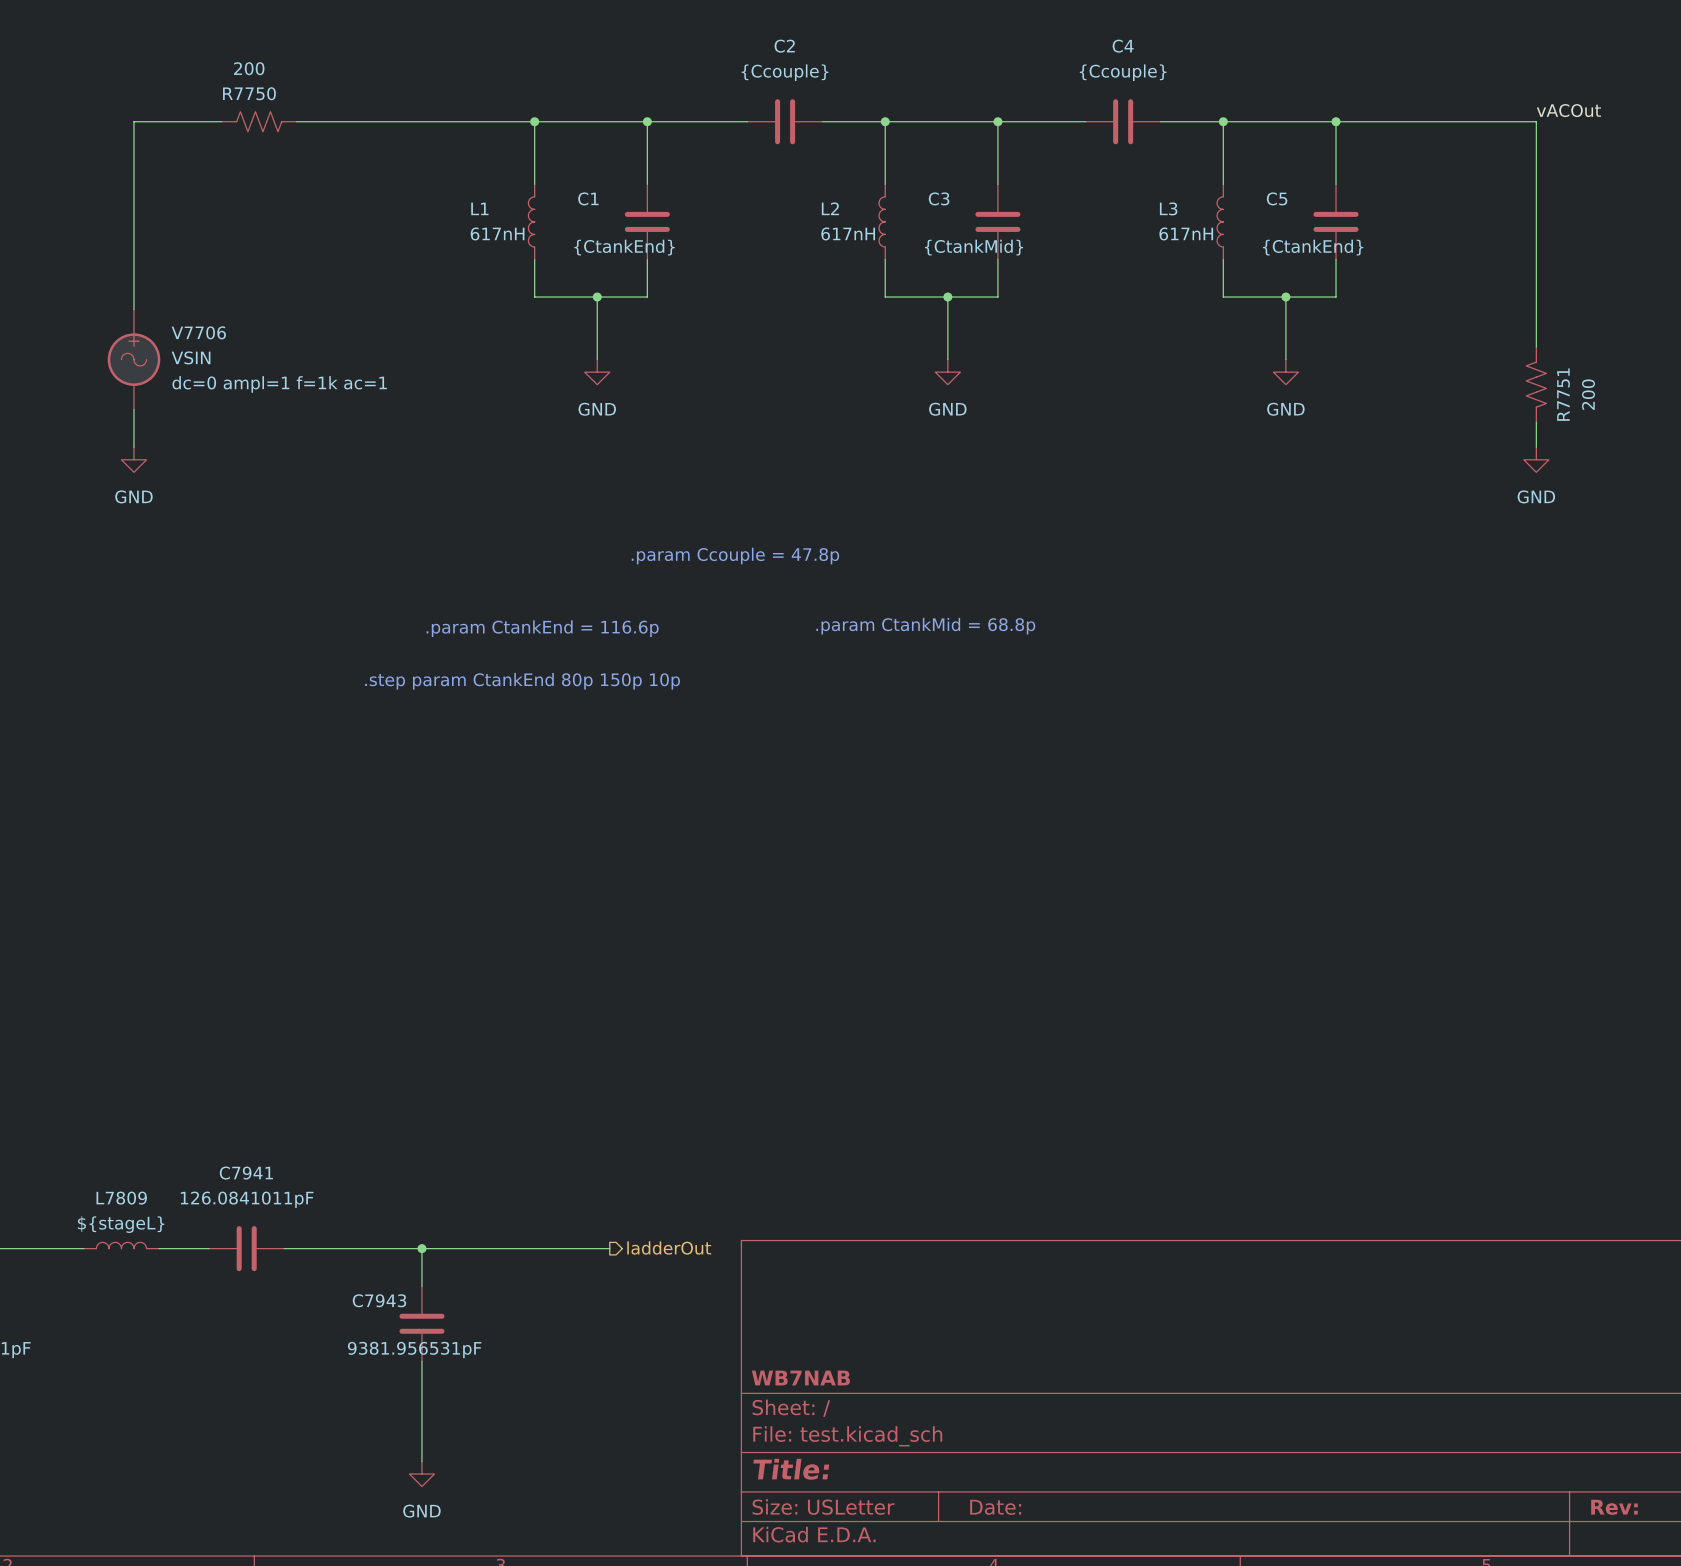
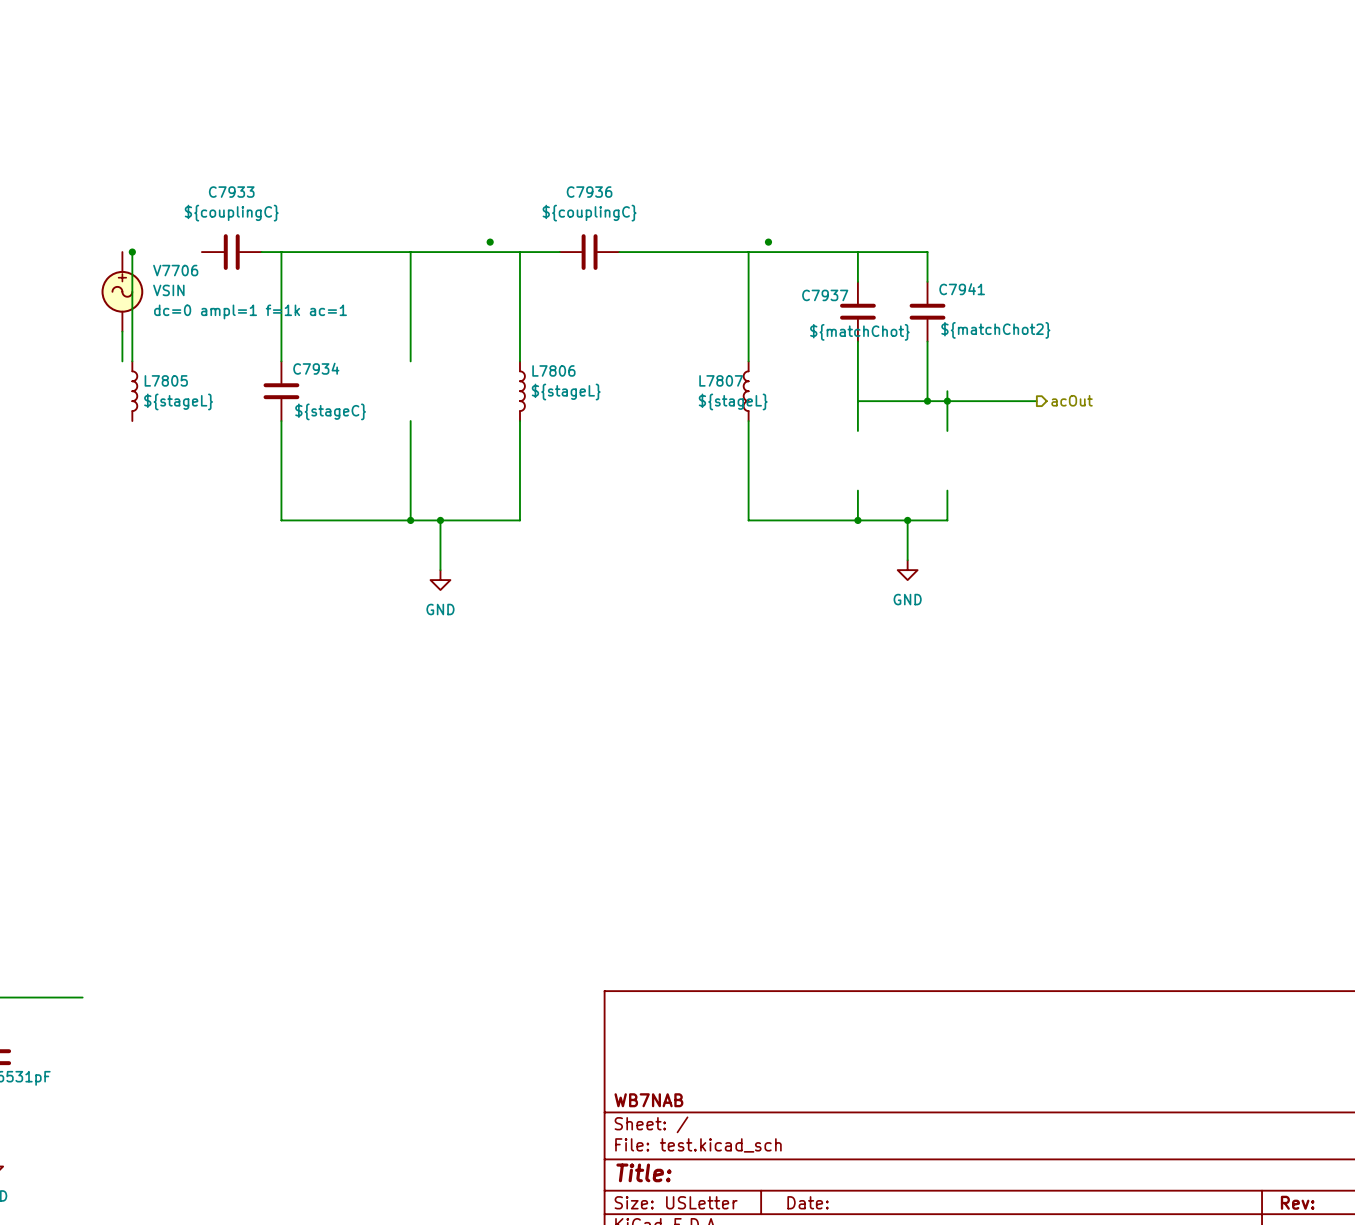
label: vACOut (1568, 110) -> none
wire: (221, 121) (133, 121) (133, 309) -> none
R7750: 200 (259, 121) -> none
wire: (296, 121) (747, 121) -> none
wire: (534, 121) (534, 184) -> none
junction: (534, 121) -> none
wire: (647, 121) (647, 184) -> none
junction: (647, 121) -> none
C2: {Ccouple} (785, 121) -> none
wire: (822, 121) (1085, 121) -> none
wire: (885, 121) (885, 184) -> none
junction: (885, 121) -> none
wire: (997, 121) (997, 184) -> none
junction: (997, 121) -> none
C4: {Ccouple} (1123, 121) -> none
wire: (1160, 121) (1536, 121) (1536, 347) -> none
wire: (1223, 121) (1223, 184) -> none
junction: (1223, 121) -> none
wire: (1336, 121) (1336, 184) -> none
junction: (1336, 121) -> none
L1: 617nH (531, 221) -> none
C1: {CtankEnd} (647, 221) -> none
L2: 617nH (882, 221) -> none
C3: {CtankMid} (997, 221) -> none
L3: 617nH (1220, 221) -> none
C5: {CtankEnd} (1336, 221) -> none
wire: (534, 259) (534, 297) (647, 297) (647, 259) -> none
wire: (885, 259) (885, 297) (997, 297) (997, 259) -> none
wire: (1223, 259) (1223, 297) (1336, 297) (1336, 259) -> none
wire: (597, 297) (597, 359) -> none
wire: (947, 297) (947, 359) -> none
wire: (1285, 297) (1285, 359) -> none
junction: (1285, 297) -> none
wire: none -> (132, 252) (132, 361)
junction: none -> (132, 252)
C7933: none -> ${couplingC} (231, 252)
wire: none -> (261, 252) (559, 252)
wire: none -> (281, 252) (281, 361)
wire: none -> (410, 252) (410, 361)
wire: none -> (519, 252) (519, 361)
C7936: none -> ${couplingC} (589, 252)
wire: none -> (619, 252) (927, 252) (927, 281)
wire: none -> (748, 252) (748, 361)
wire: none -> (857, 252) (857, 281)
power symbol: GND (597, 372) -> none
power symbol: GND (947, 372) -> none
power symbol: GND (1285, 372) -> none
C7937: none -> ${matchChot} (857, 311)
R7751: 200 (1536, 384) -> none
wire: none -> (857, 341) (857, 430)
wire: none -> (927, 341) (927, 401)
wire: (1536, 422) (1536, 447) -> none
power symbol: GND (133, 459) -> none
power symbol: GND (1536, 459) -> none
L7805: none -> ${stageL} (134, 391)
C7934: none -> ${stageC} (281, 391)
L7806: none -> ${stageL} (522, 391)
L7807: none -> ${stageL} (746, 391)
wire: none -> (947, 391) (947, 430)
hierarchical label: none -> acOut (1072, 400)
wire: none -> (857, 401) (1036, 401)
junction: none -> (927, 401)
junction: none -> (947, 401)
wire: none -> (281, 421) (281, 520) (519, 520) (519, 421)
wire: none -> (410, 421) (410, 520)
wire: none -> (748, 421) (748, 520) (947, 520) (947, 490)
text: .param Ccouple = 47.8p (735, 556) -> none
wire: none -> (857, 490) (857, 520)
text: .param CtankMid = 68.8p (925, 626) -> none
text: .param CtankEnd = 116.6p (542, 628) -> none
junction: none -> (410, 520)
wire: none -> (440, 520) (440, 570)
junction: none -> (440, 520)
junction: none -> (857, 520)
wire: none -> (907, 520) (907, 560)
junction: none -> (907, 520)
text: .step param CtankEnd 80p 150p 10p (522, 681) -> none
power symbol: none -> GND (907, 570)
power symbol: none -> GND (440, 580)
C7941 name position: C7941 (246, 1173) -> C7941 (962, 289)
C7941 value: 126.0841011pF (247, 1199) -> ${matchChot2} (995, 330)
L7809: ${stageL} (121, 1245) -> none
wire: (159, 1248) (209, 1248) -> none
C7941 rotation: 0° (246, 1248) -> 90° clockwise (927, 311)
C7941 position: (246, 1248) -> (927, 311)
wire: (284, 1248) (609, 1248) -> none
wire: (421, 1248) (421, 1286) -> none
junction: (421, 1248) -> none
hierarchical label: ladderOut (669, 1248) -> none
C7943: 9381.956531pF (421, 1323) -> none
wire: (421, 1361) (421, 1461) -> none
power symbol: GND (421, 1474) -> none

